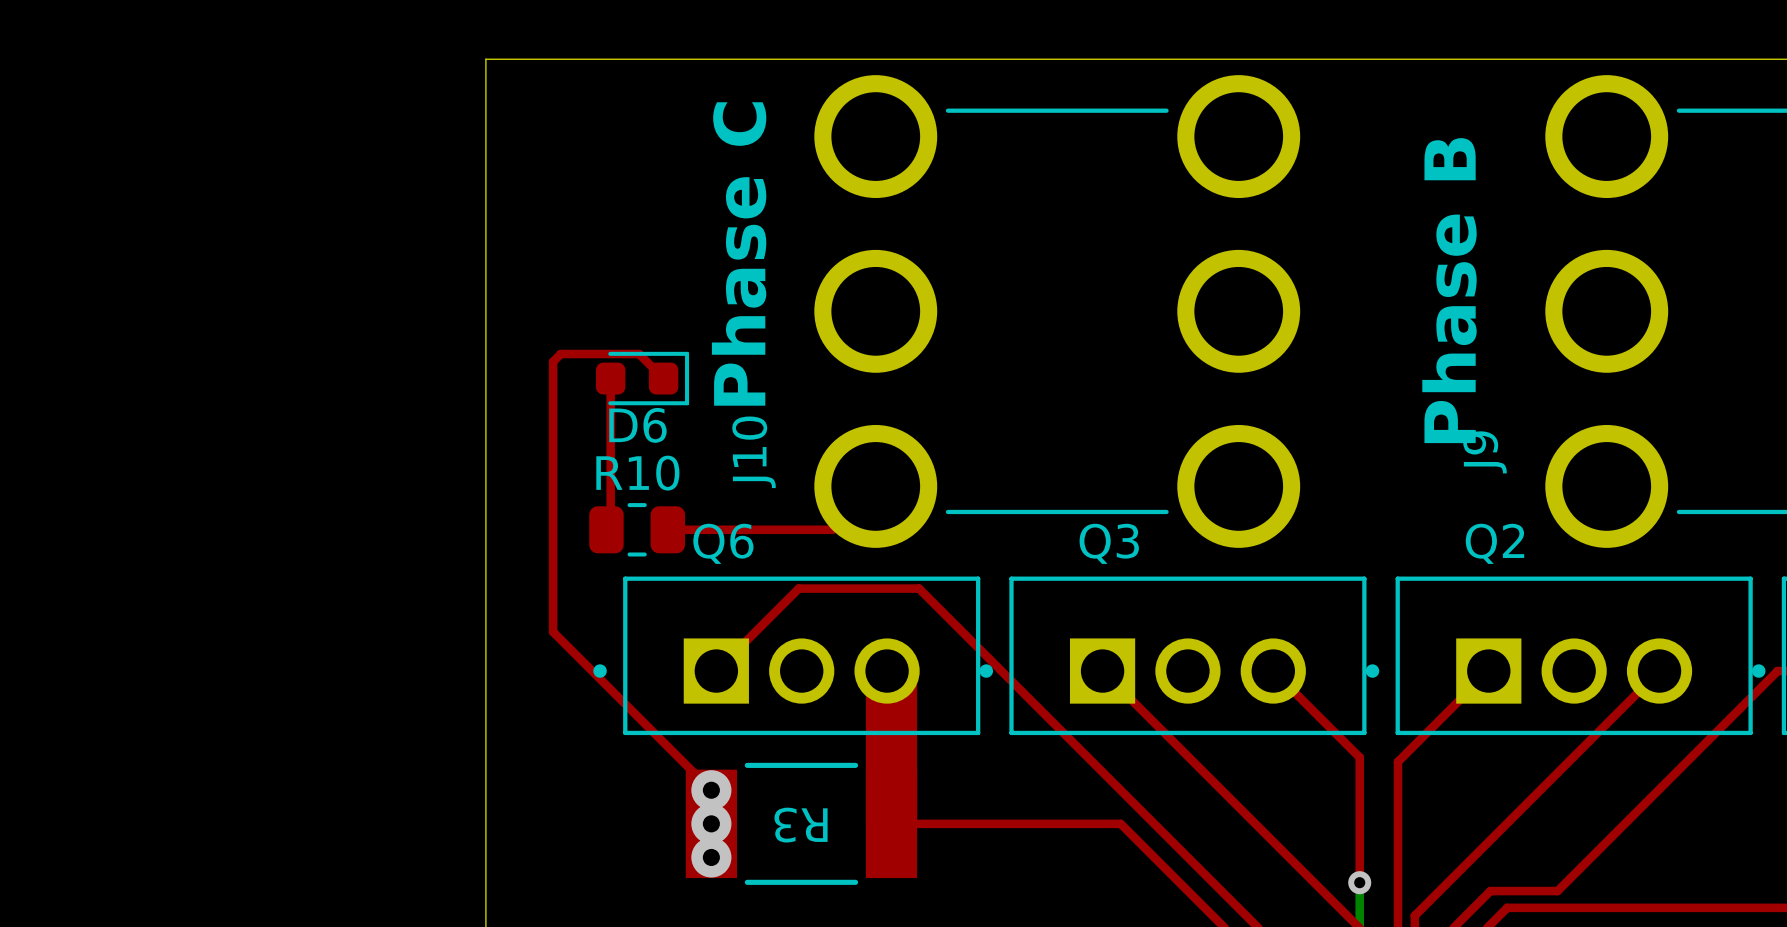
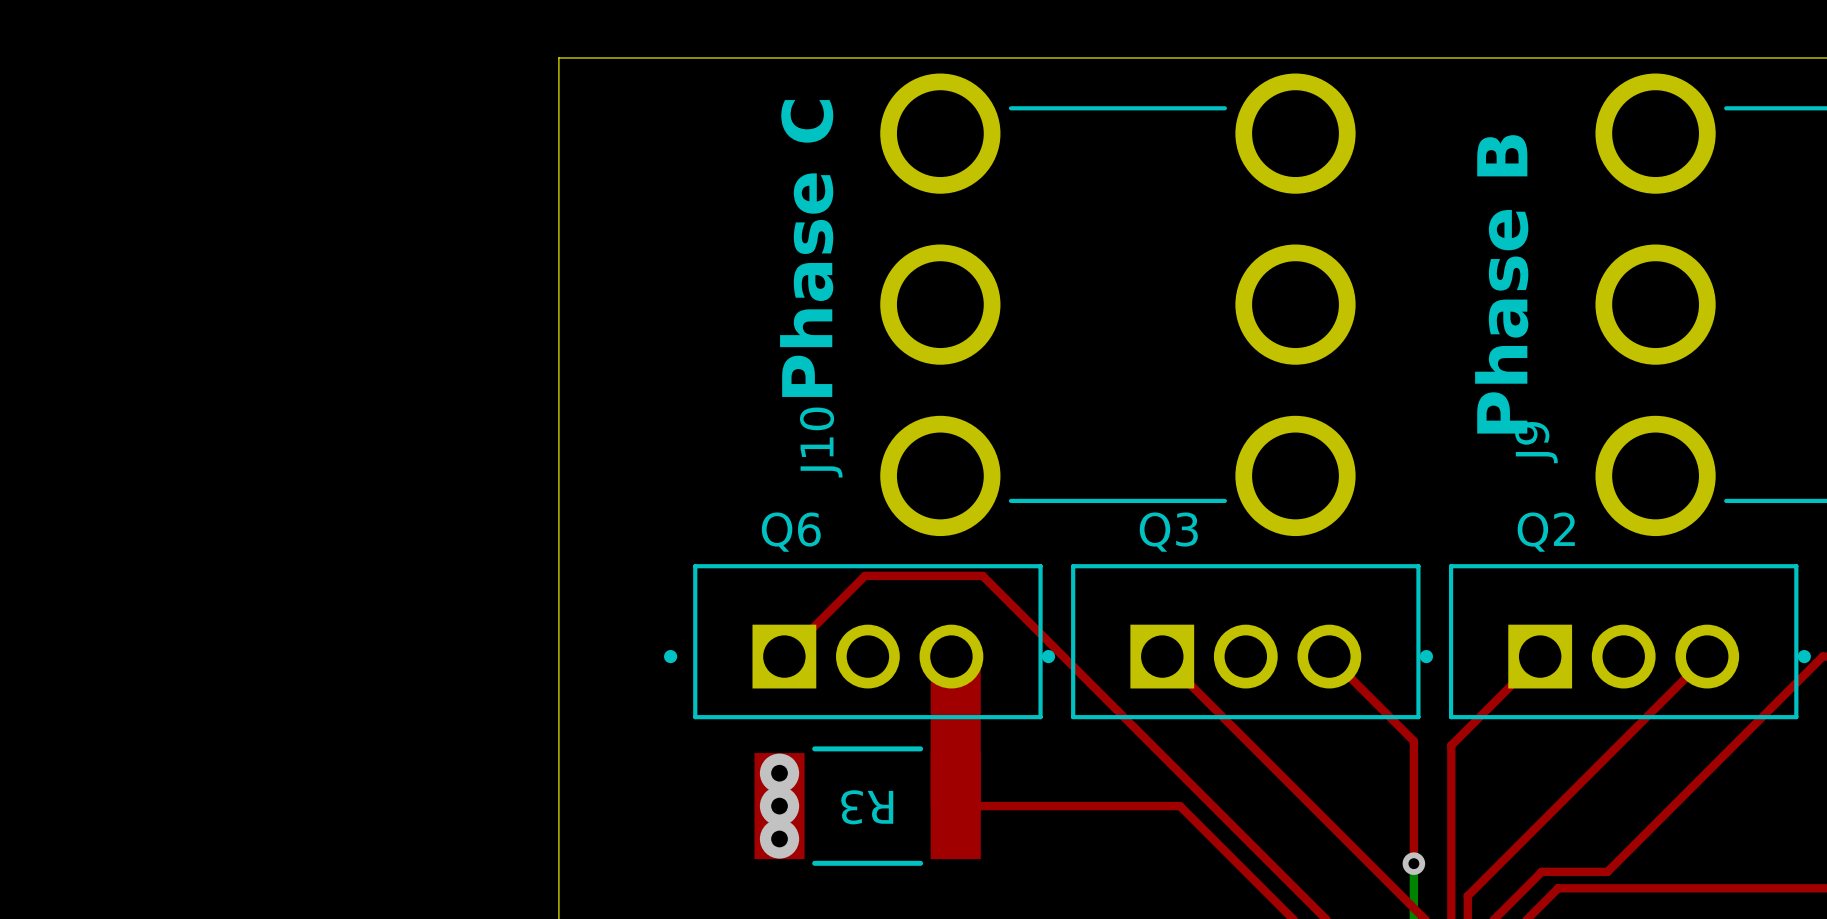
top track: (610, 378) (610, 525) (606, 529) -> none
D6: (642, 378) -> none
top track: (663, 378) (639, 354) (560, 354) (553, 361) (553, 631) (711, 790) -> none
top track: (875, 486) (832, 529) (667, 529) -> none
R10: (637, 529) -> none

